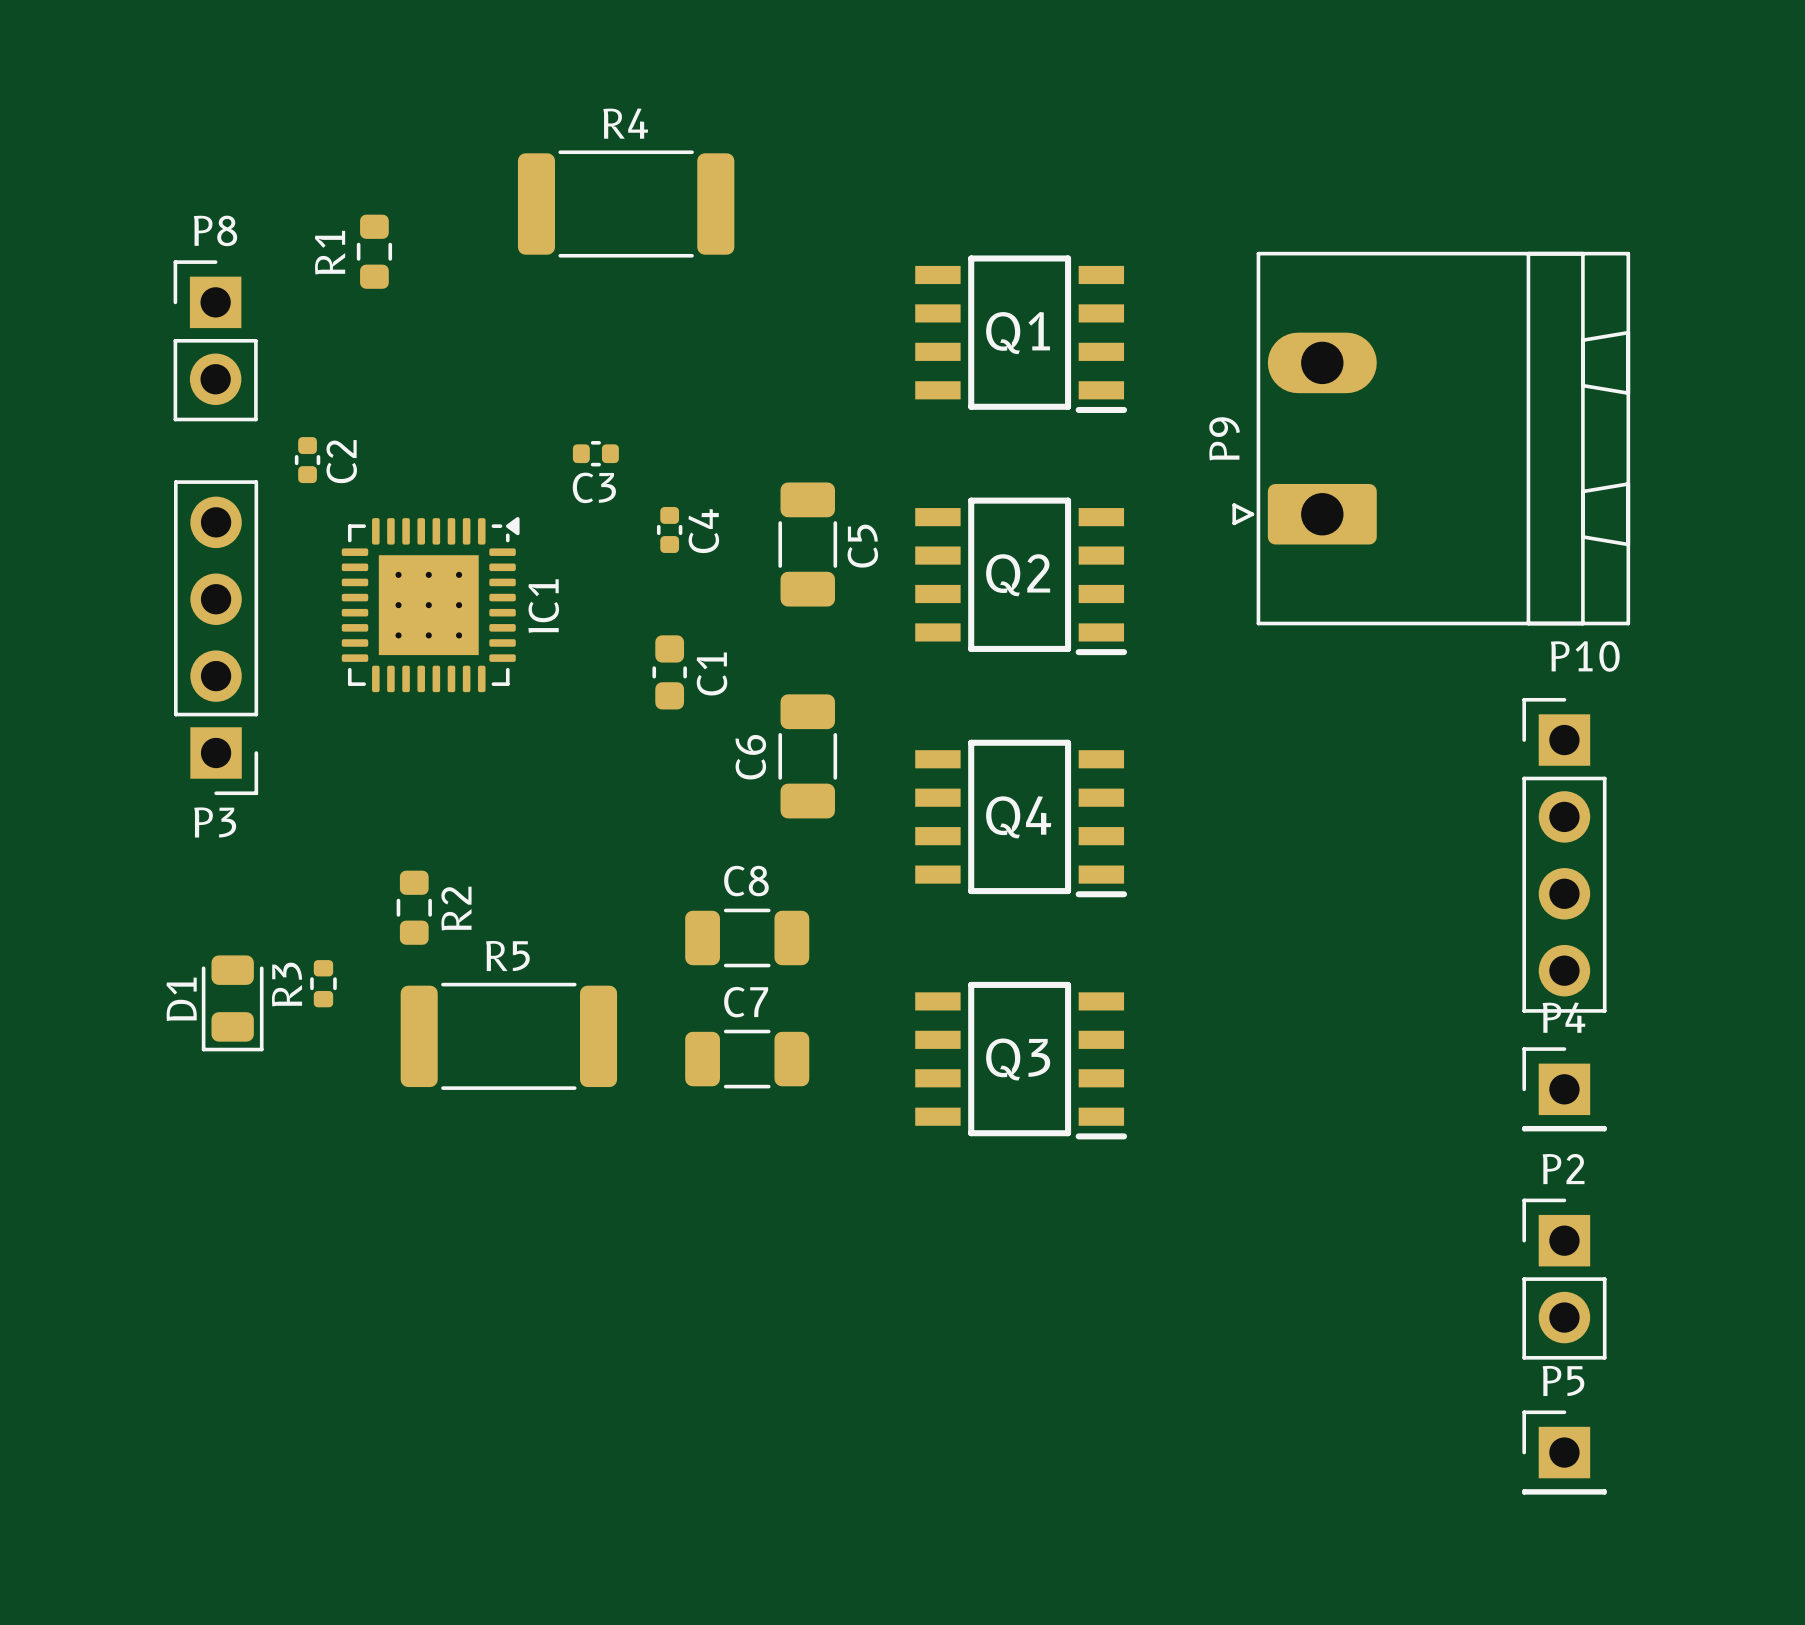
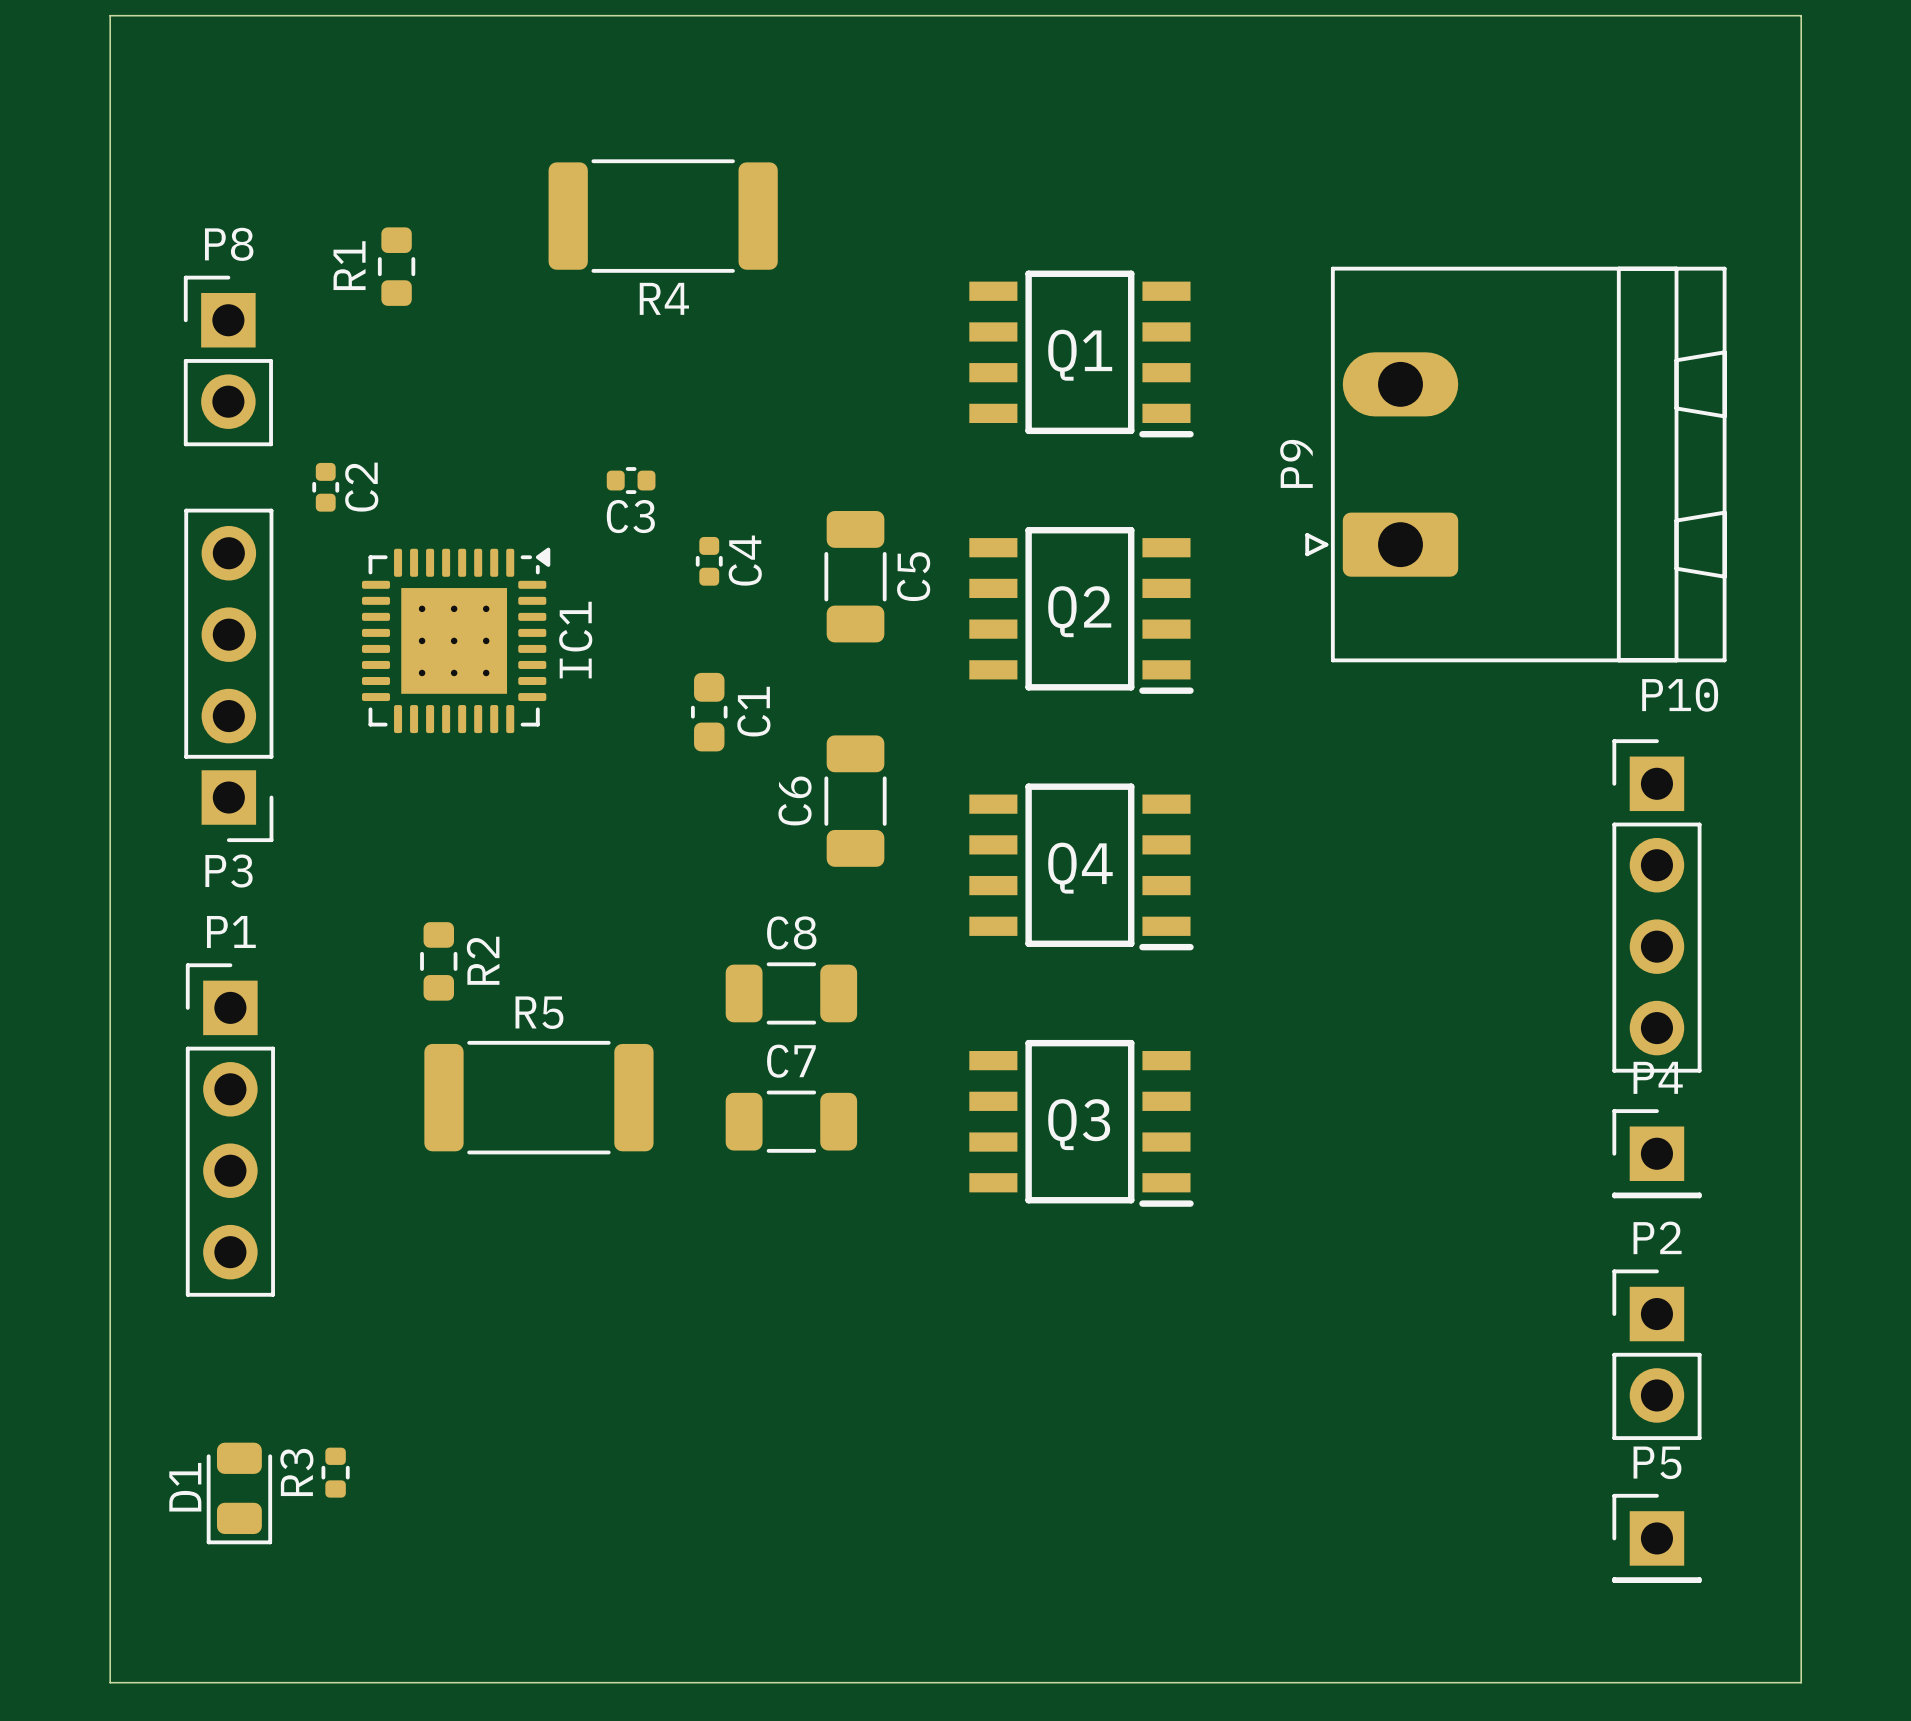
board edge: none -> (110, 15) (1801, 15) (1801, 1682) (110, 1682) (110, 15)
R4 name position: R4 (625, 123) -> R4 (664, 298)
R3 position: (323, 983) -> (335, 1472)
D1 position: (232, 1003) -> (239, 1493)
P1: none -> (230, 1130)

